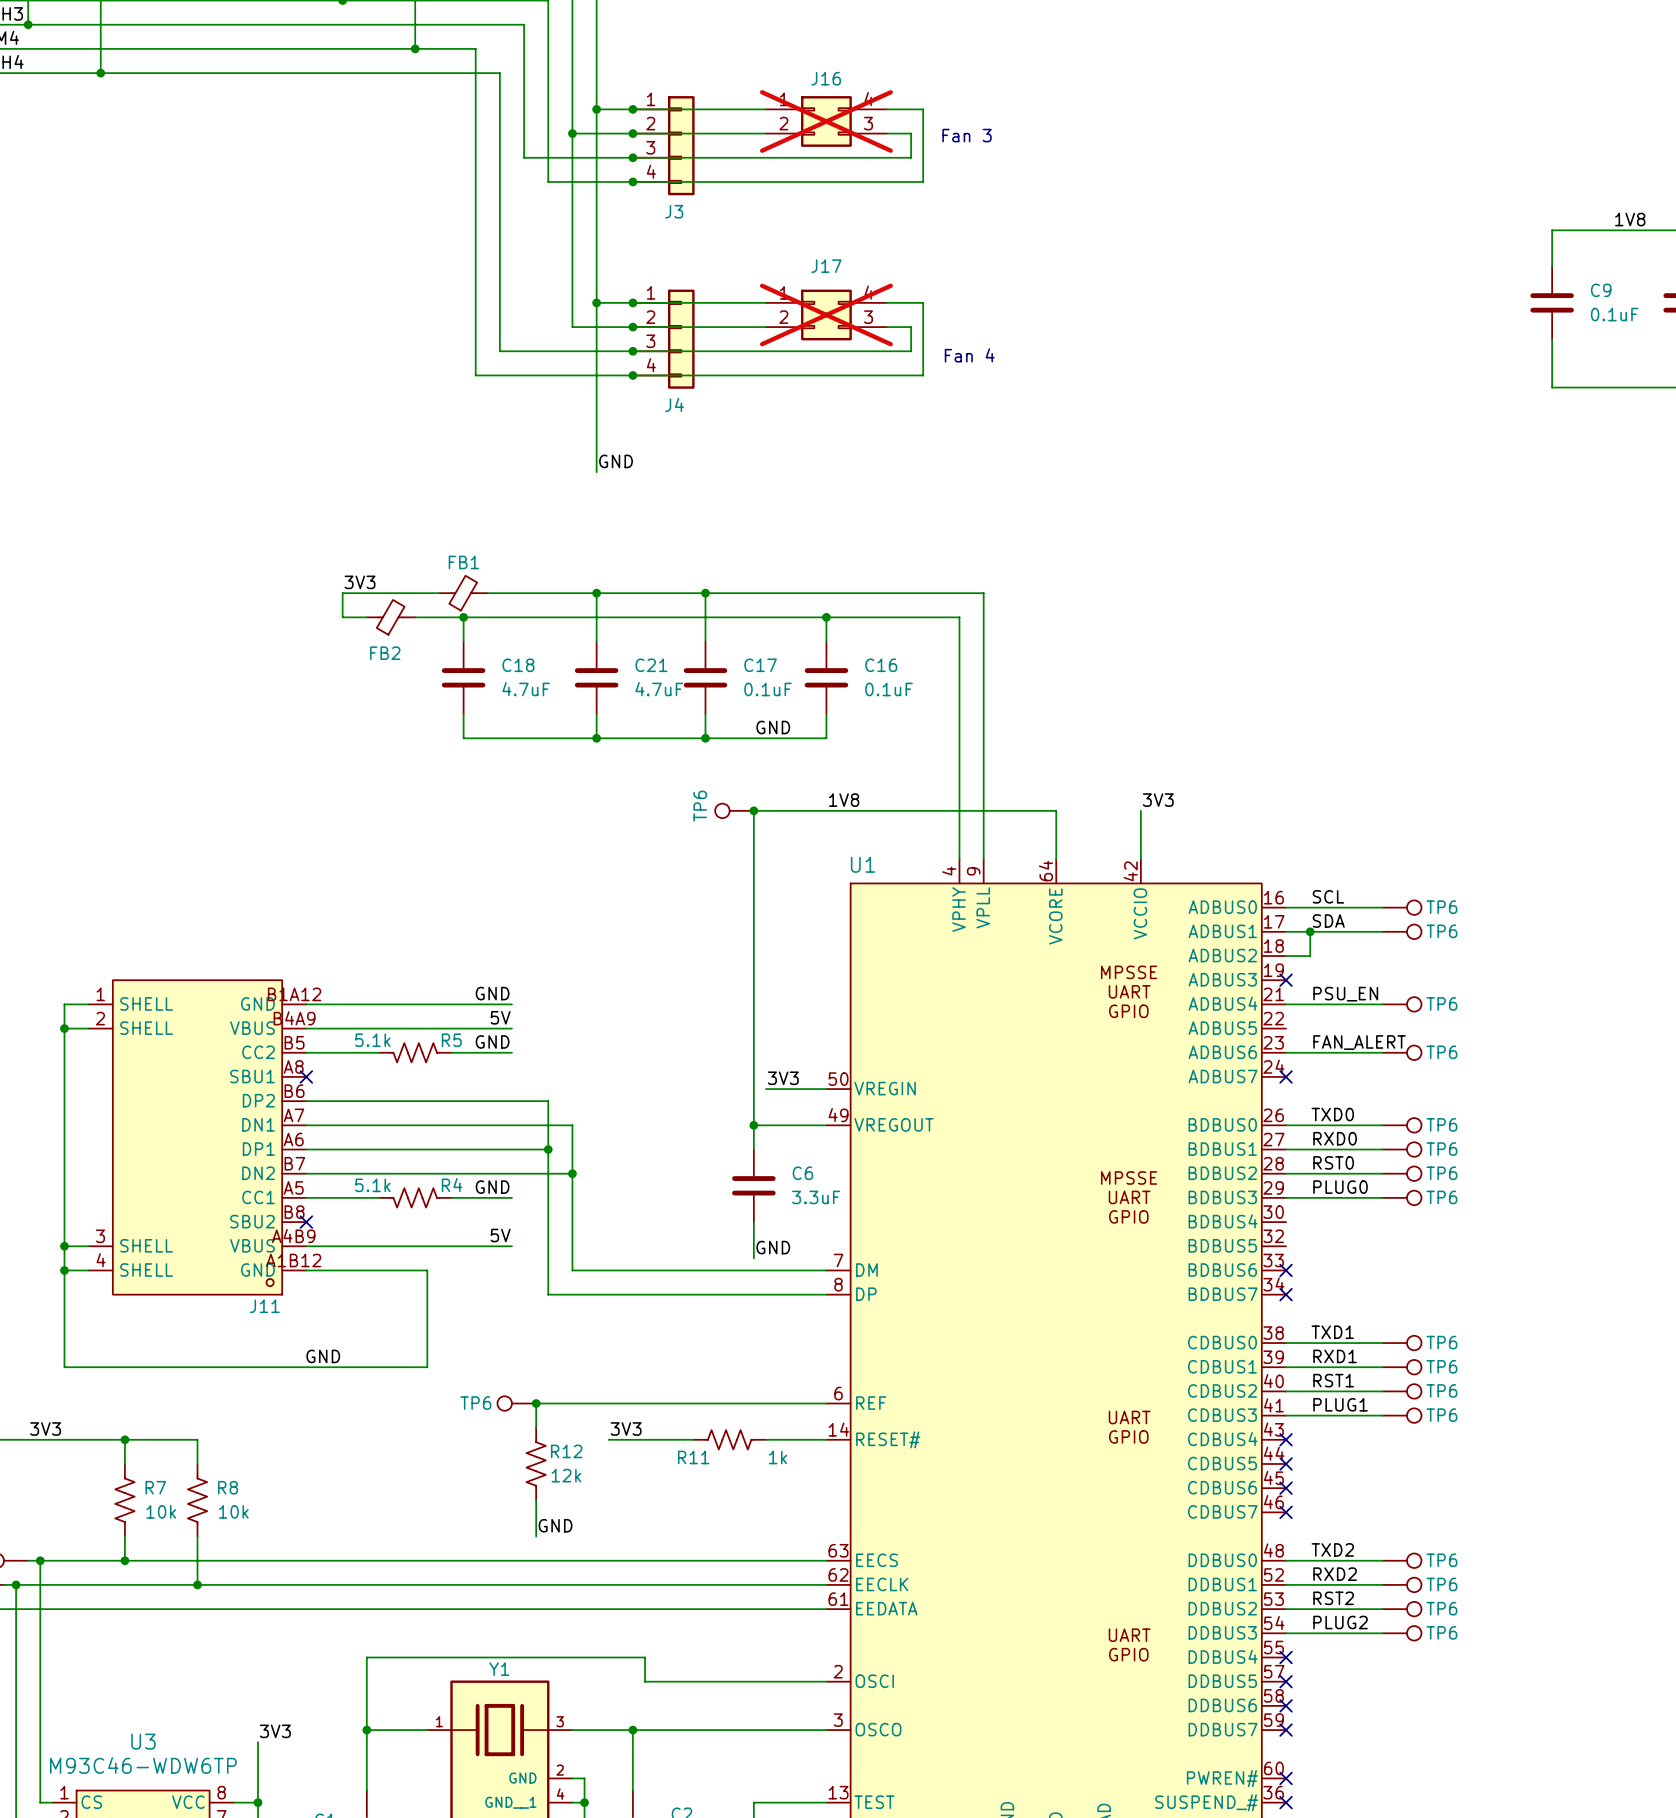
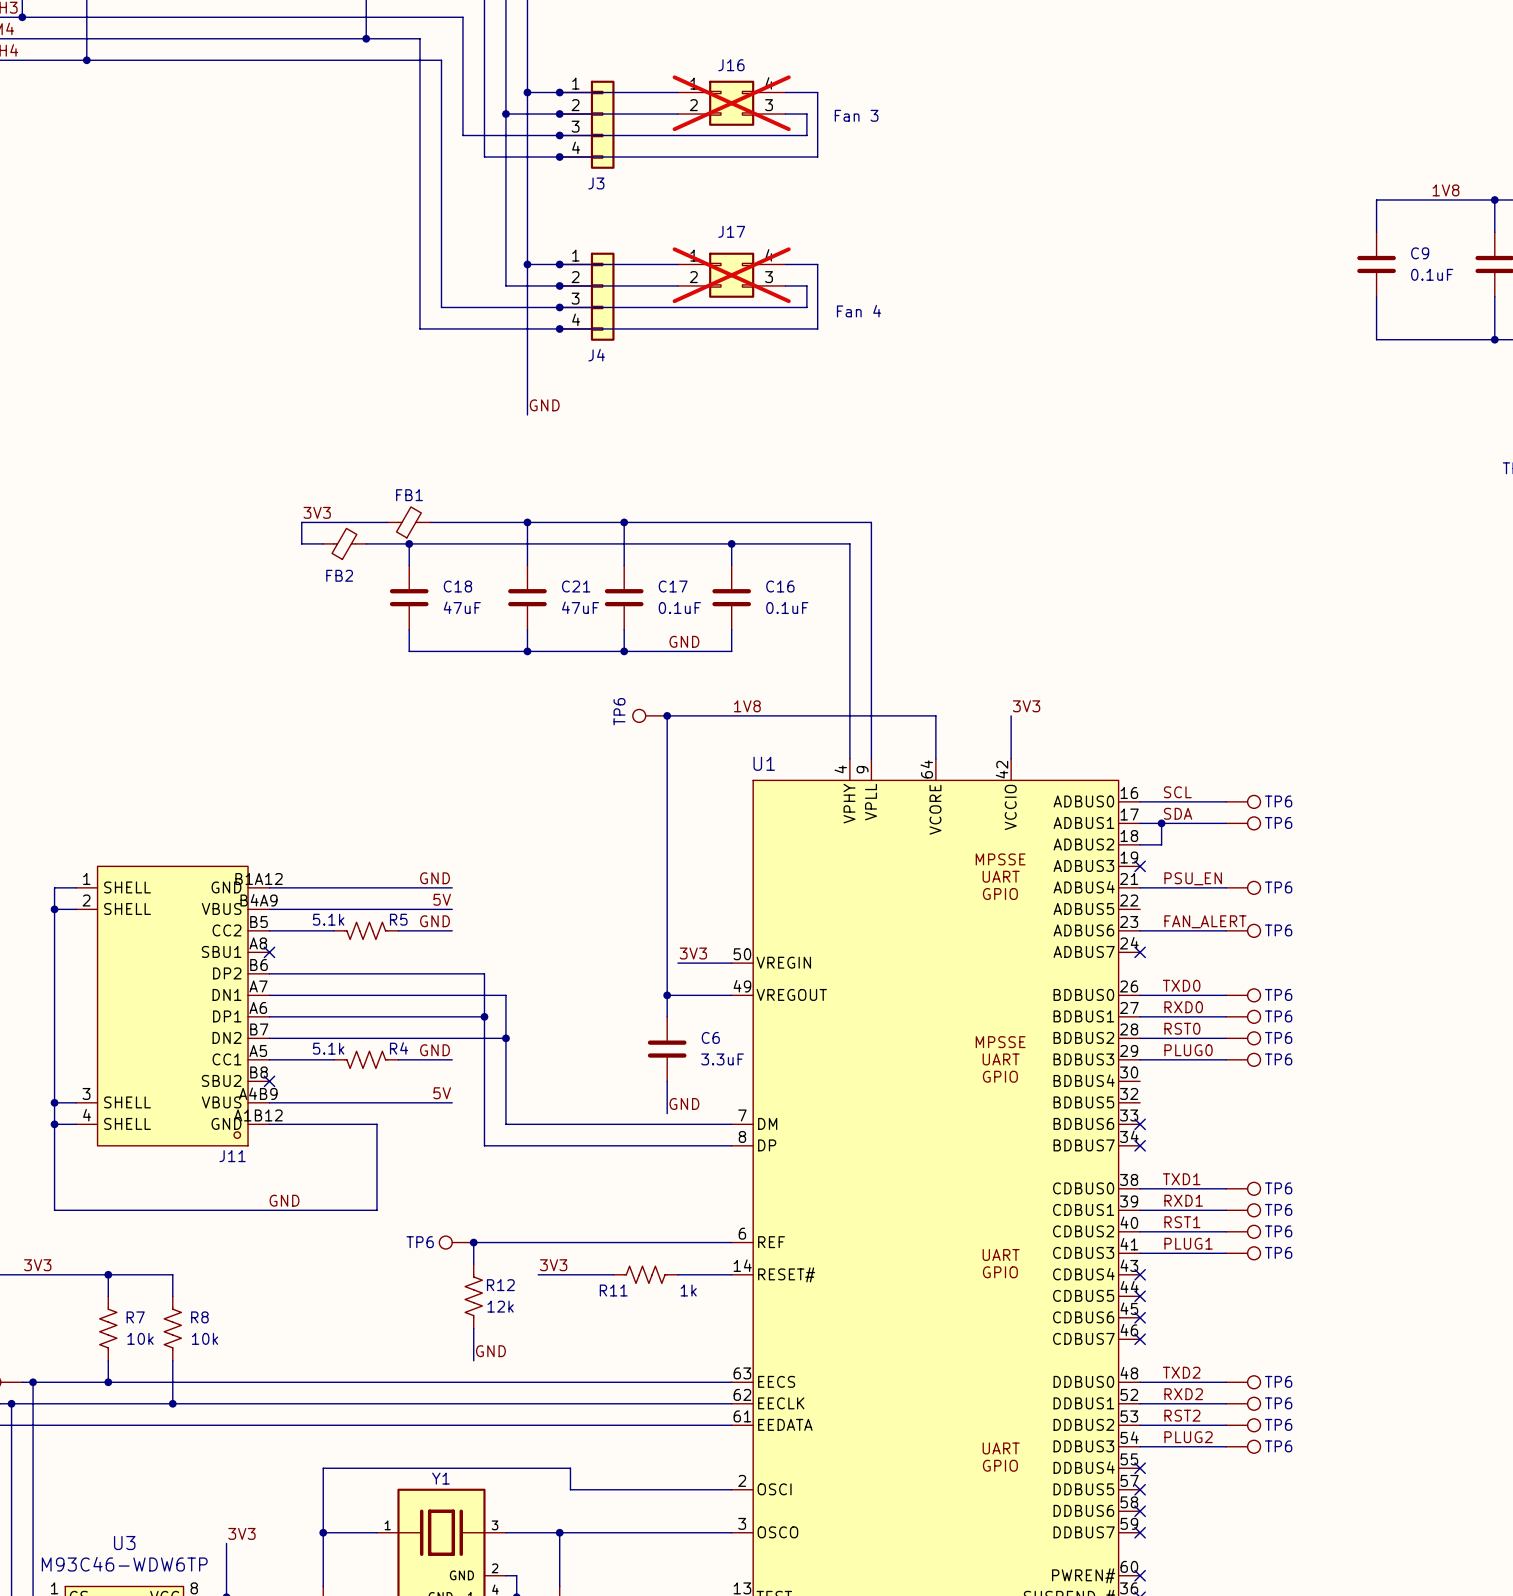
C18 value: 4.7uF (526, 689) -> 47uF (462, 607)
C21 value: 4.7uF (659, 689) -> 47uF (580, 607)

